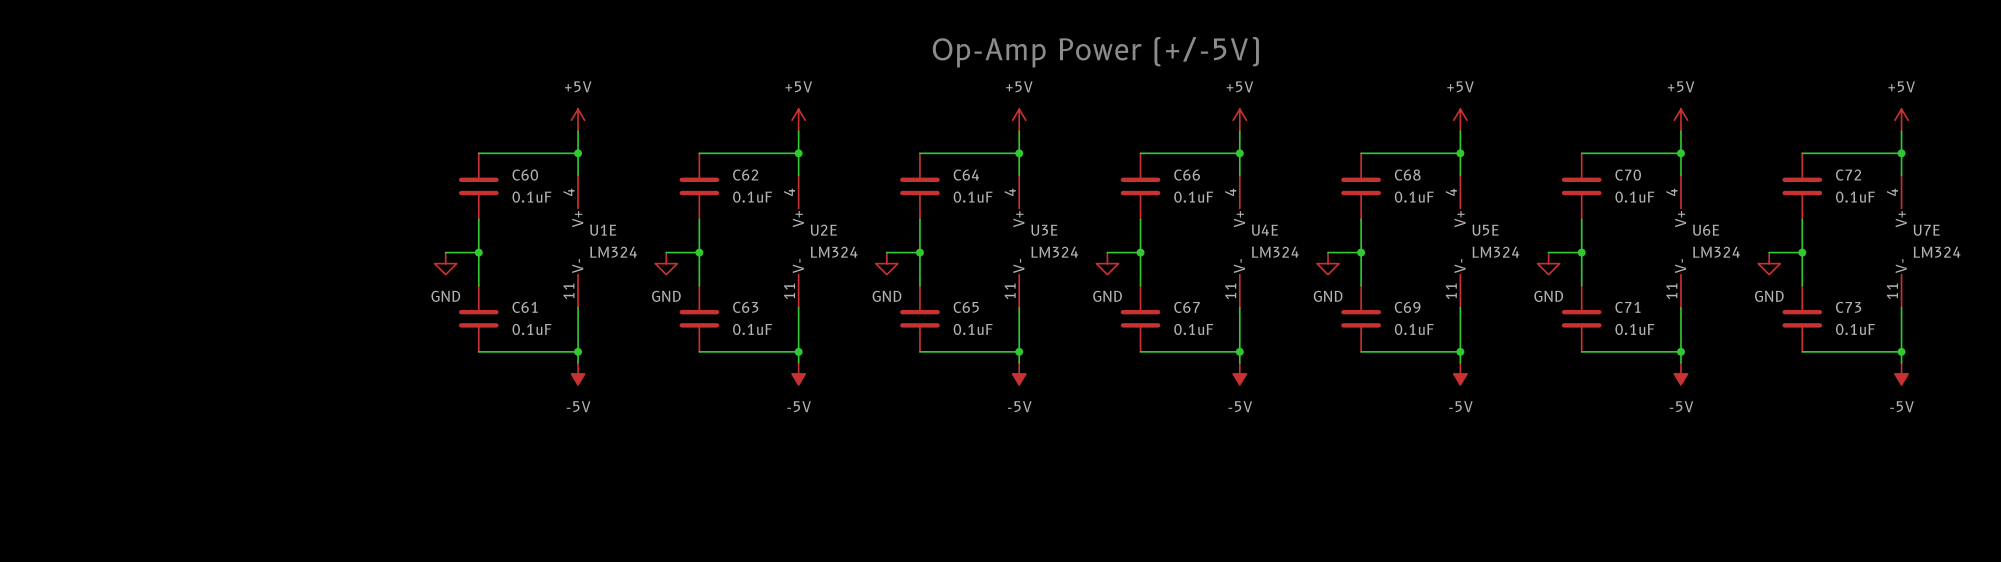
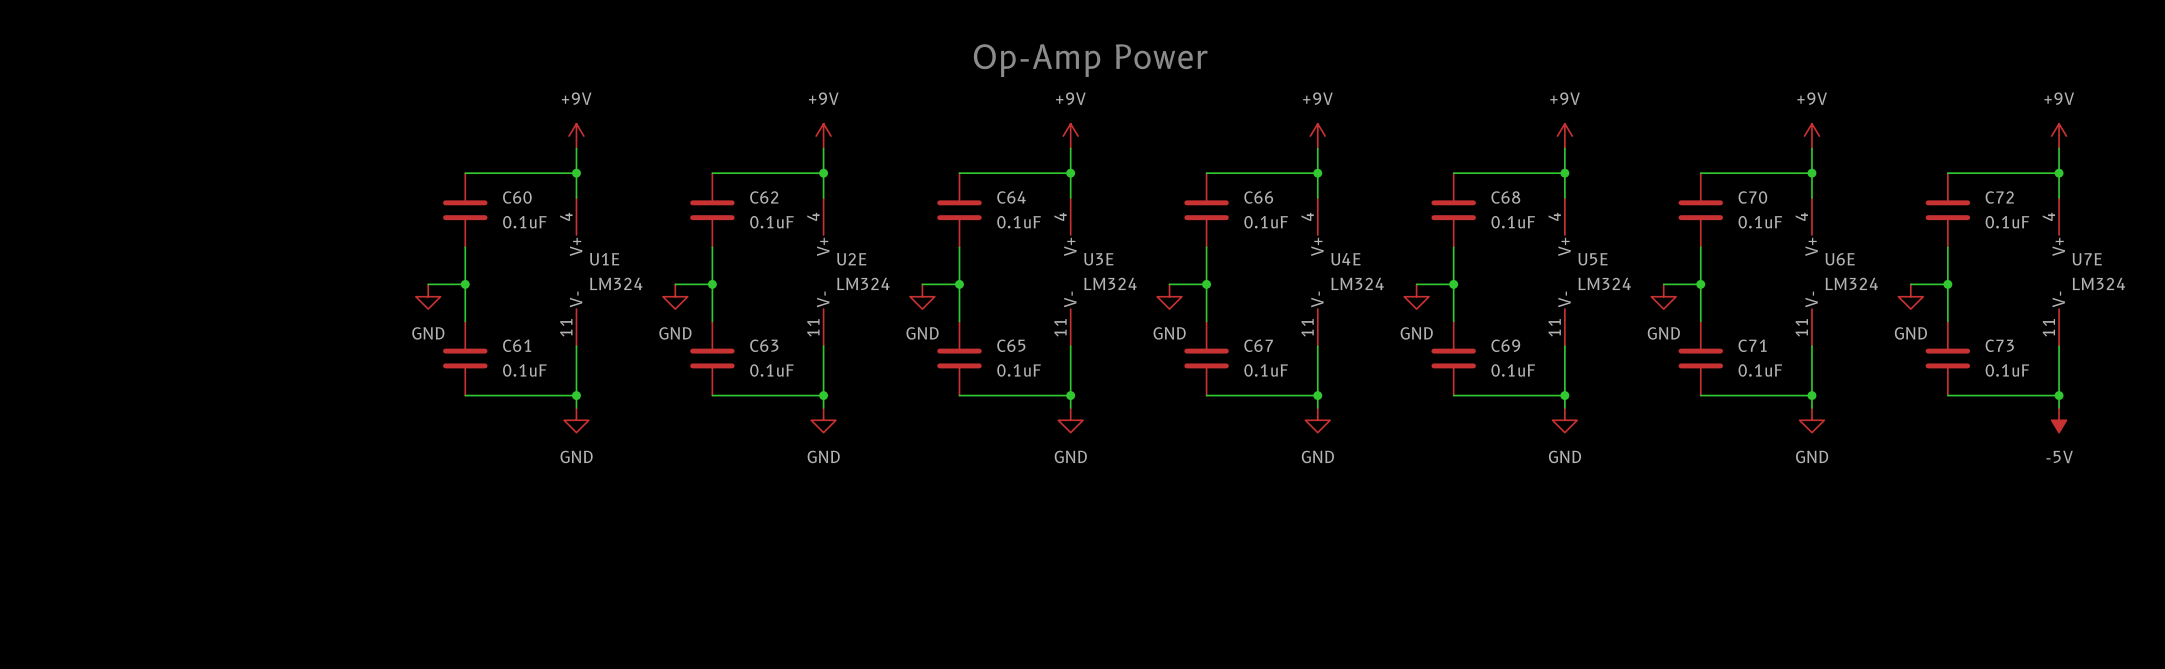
text: Op-Amp Power (+/-5V) (1095, 52) -> Op-Amp Power (1090, 60)
power symbol: +5V (578, 120) -> +9V (576, 136)
power symbol: +5V (798, 120) -> +9V (823, 136)
power symbol: +5V (1019, 120) -> +9V (1070, 136)
power symbol: +5V (1239, 120) -> +9V (1317, 136)
power symbol: +5V (1460, 120) -> +9V (1564, 136)
power symbol: +5V (1680, 120) -> +9V (1811, 136)
power symbol: +5V (1901, 120) -> +9V (2059, 136)
power symbol: -5V (578, 373) -> GND (576, 420)
power symbol: -5V (798, 373) -> GND (823, 420)
power symbol: -5V (1019, 373) -> GND (1070, 420)
power symbol: -5V (1239, 373) -> GND (1317, 420)
power symbol: -5V (1460, 373) -> GND (1564, 420)
power symbol: -5V (1680, 373) -> GND (1811, 420)

